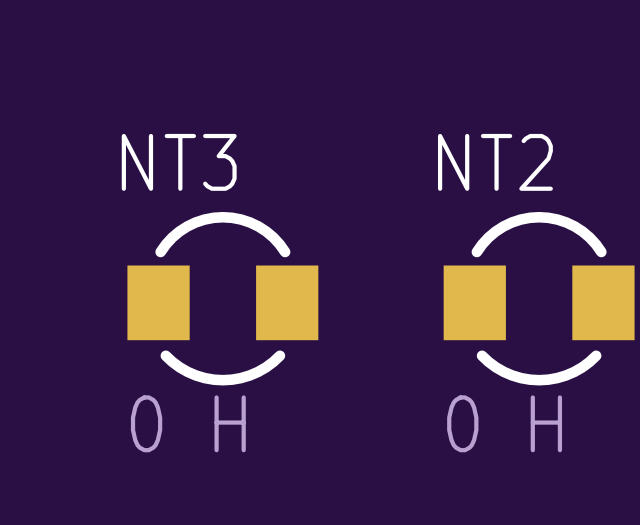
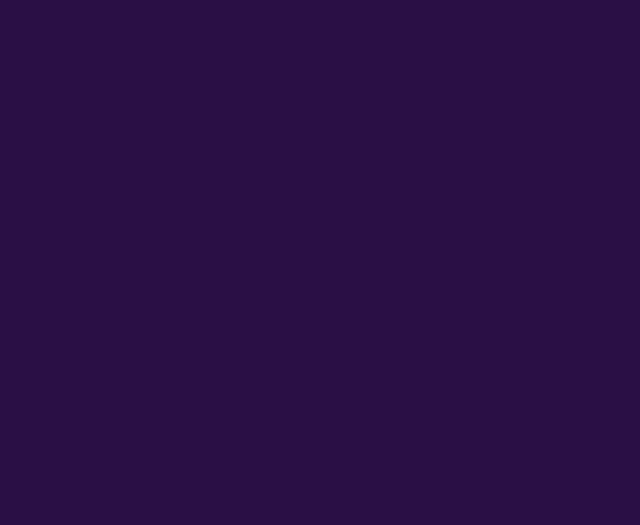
NT3: 0 H (222, 298) -> none
NT2: 0 H (539, 298) -> none

